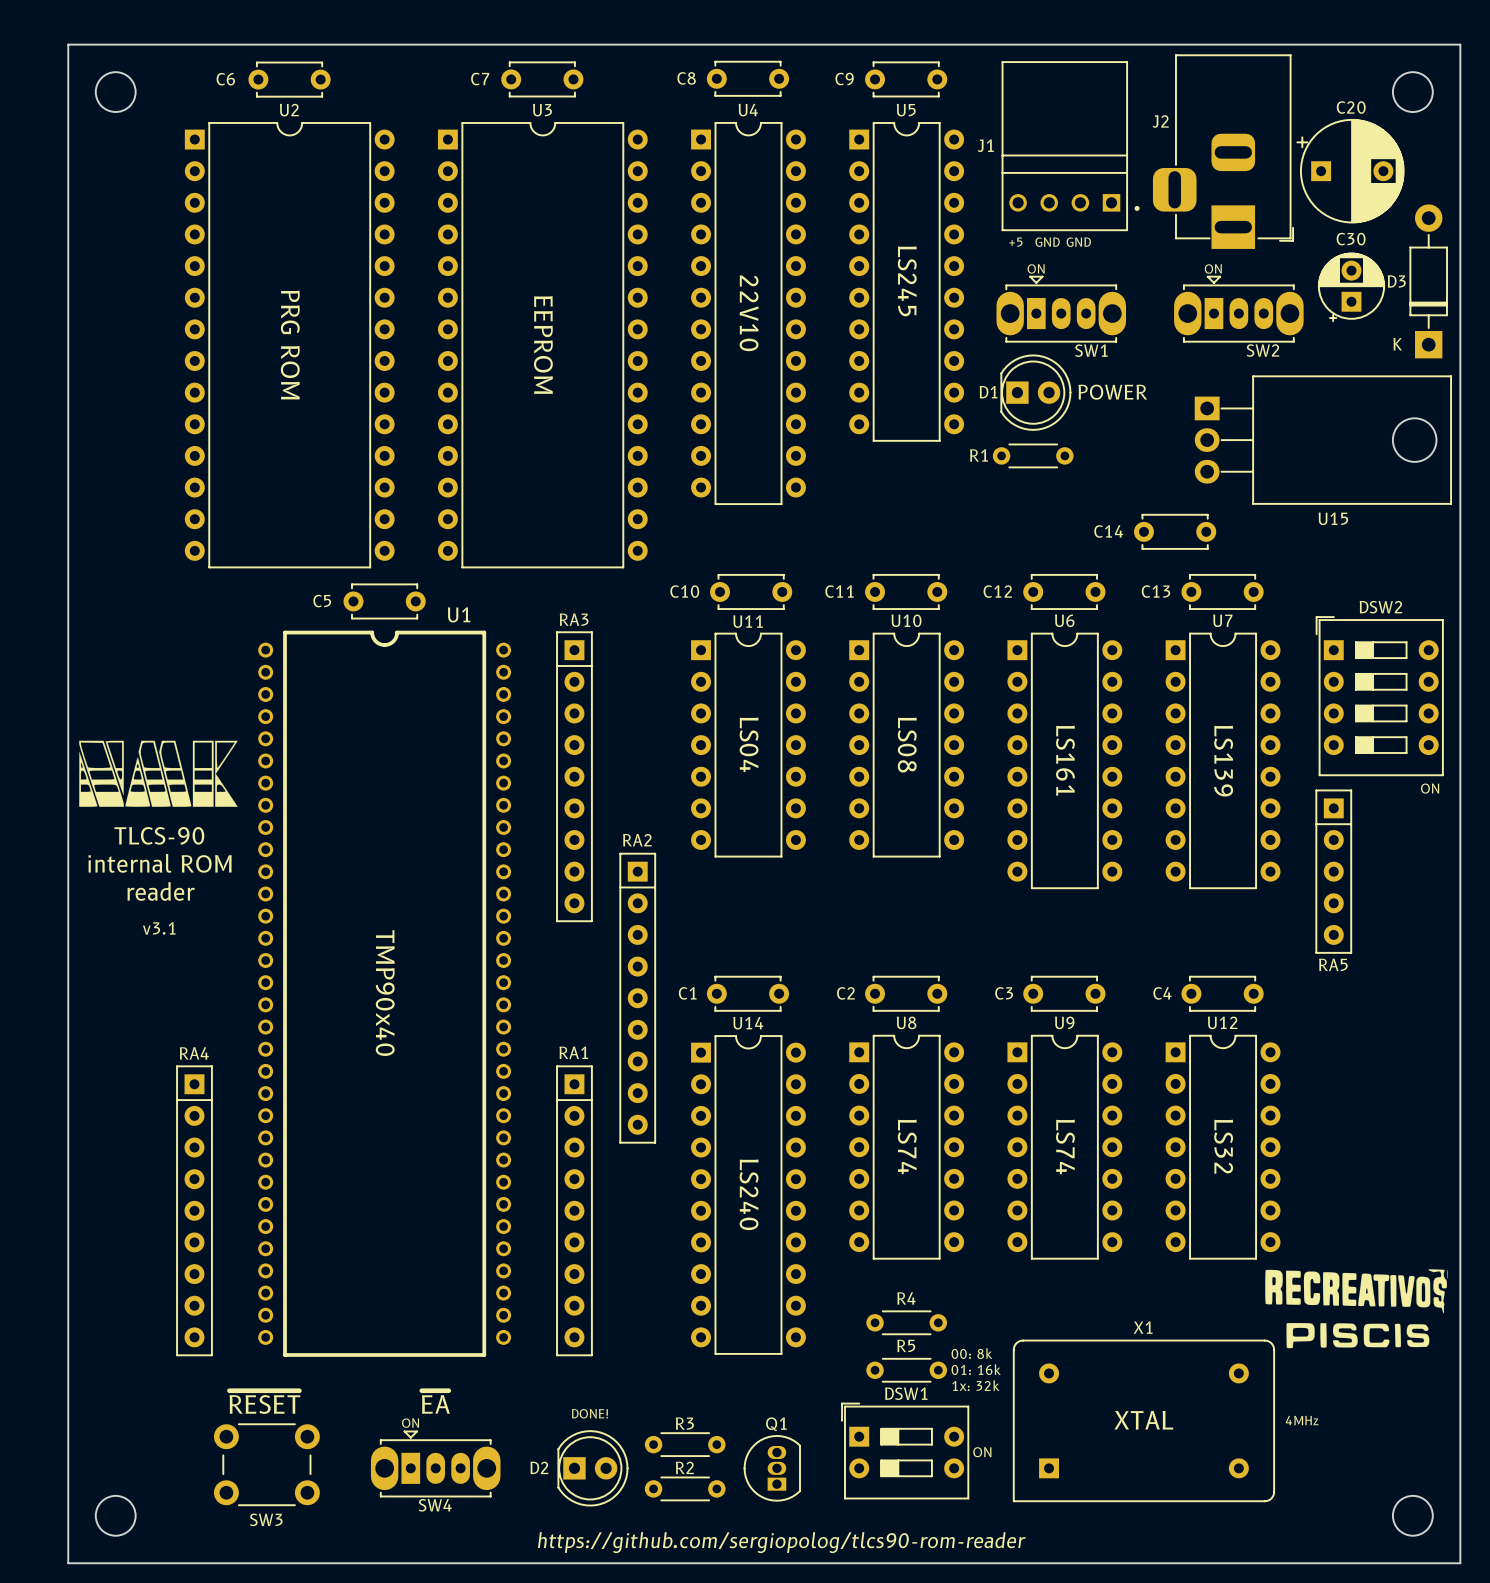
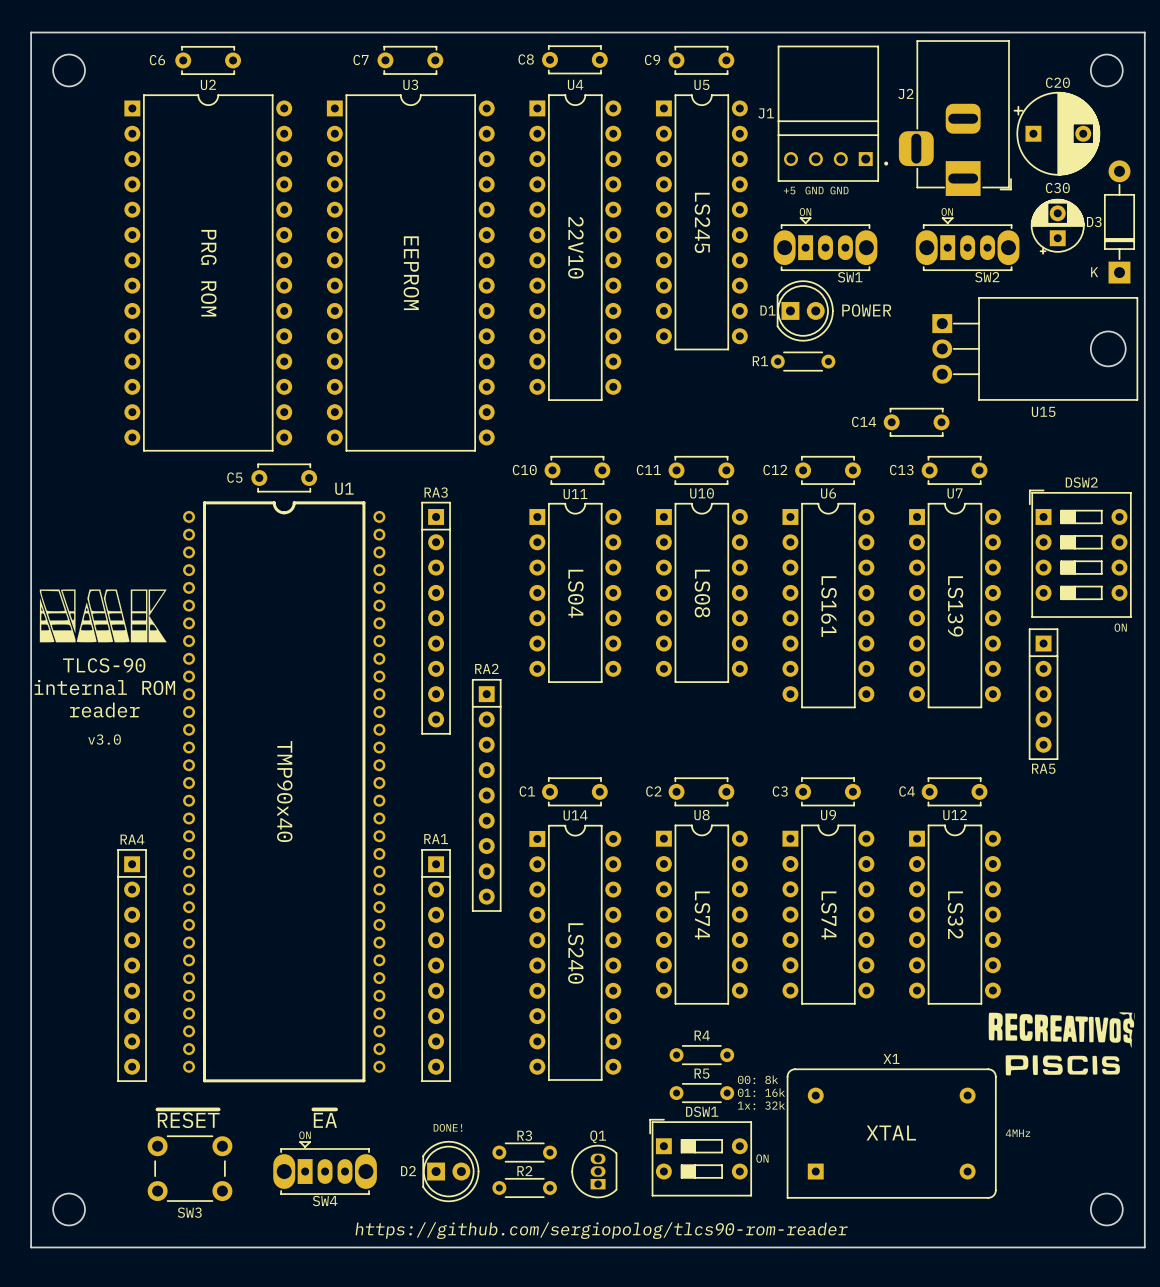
text: v3.1 (159, 928) -> v3.0 (104, 739)

